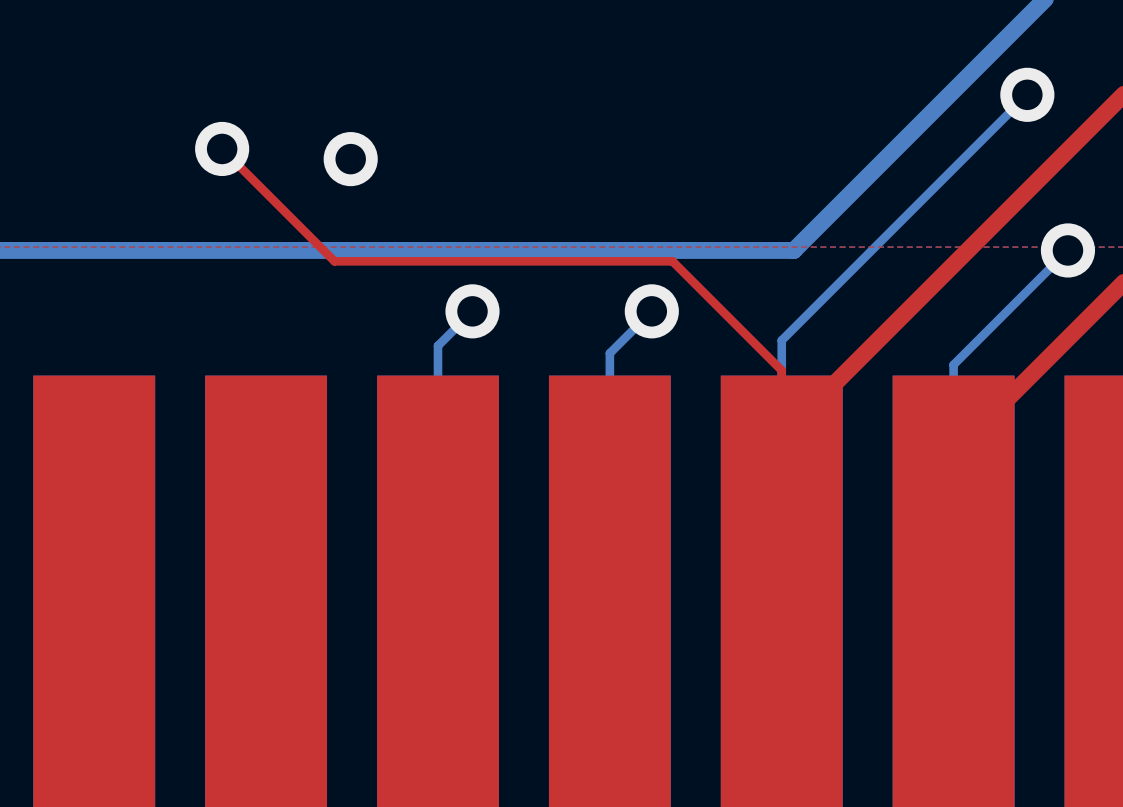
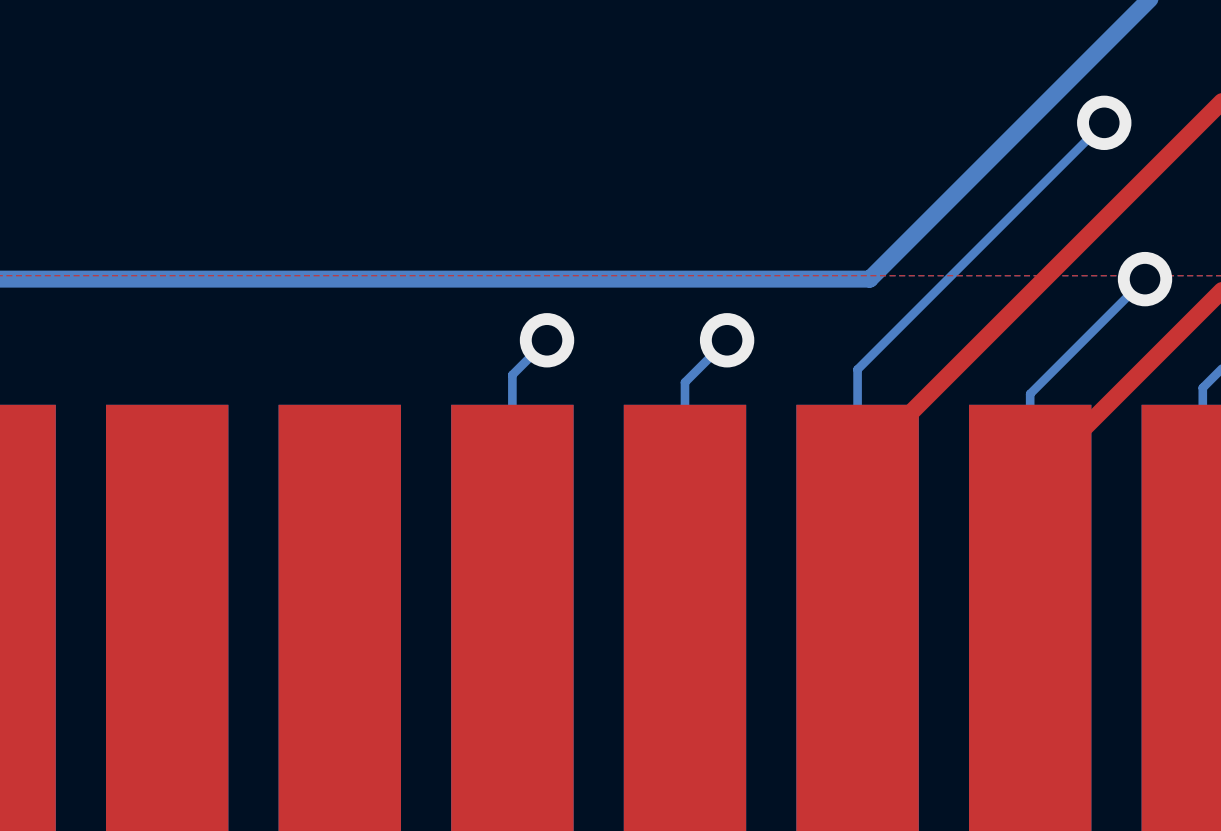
top track: (222, 148) (334, 261) (672, 261) (781, 370) (781, 612) -> none
via: (222, 148) -> none
via: (350, 159) -> none

